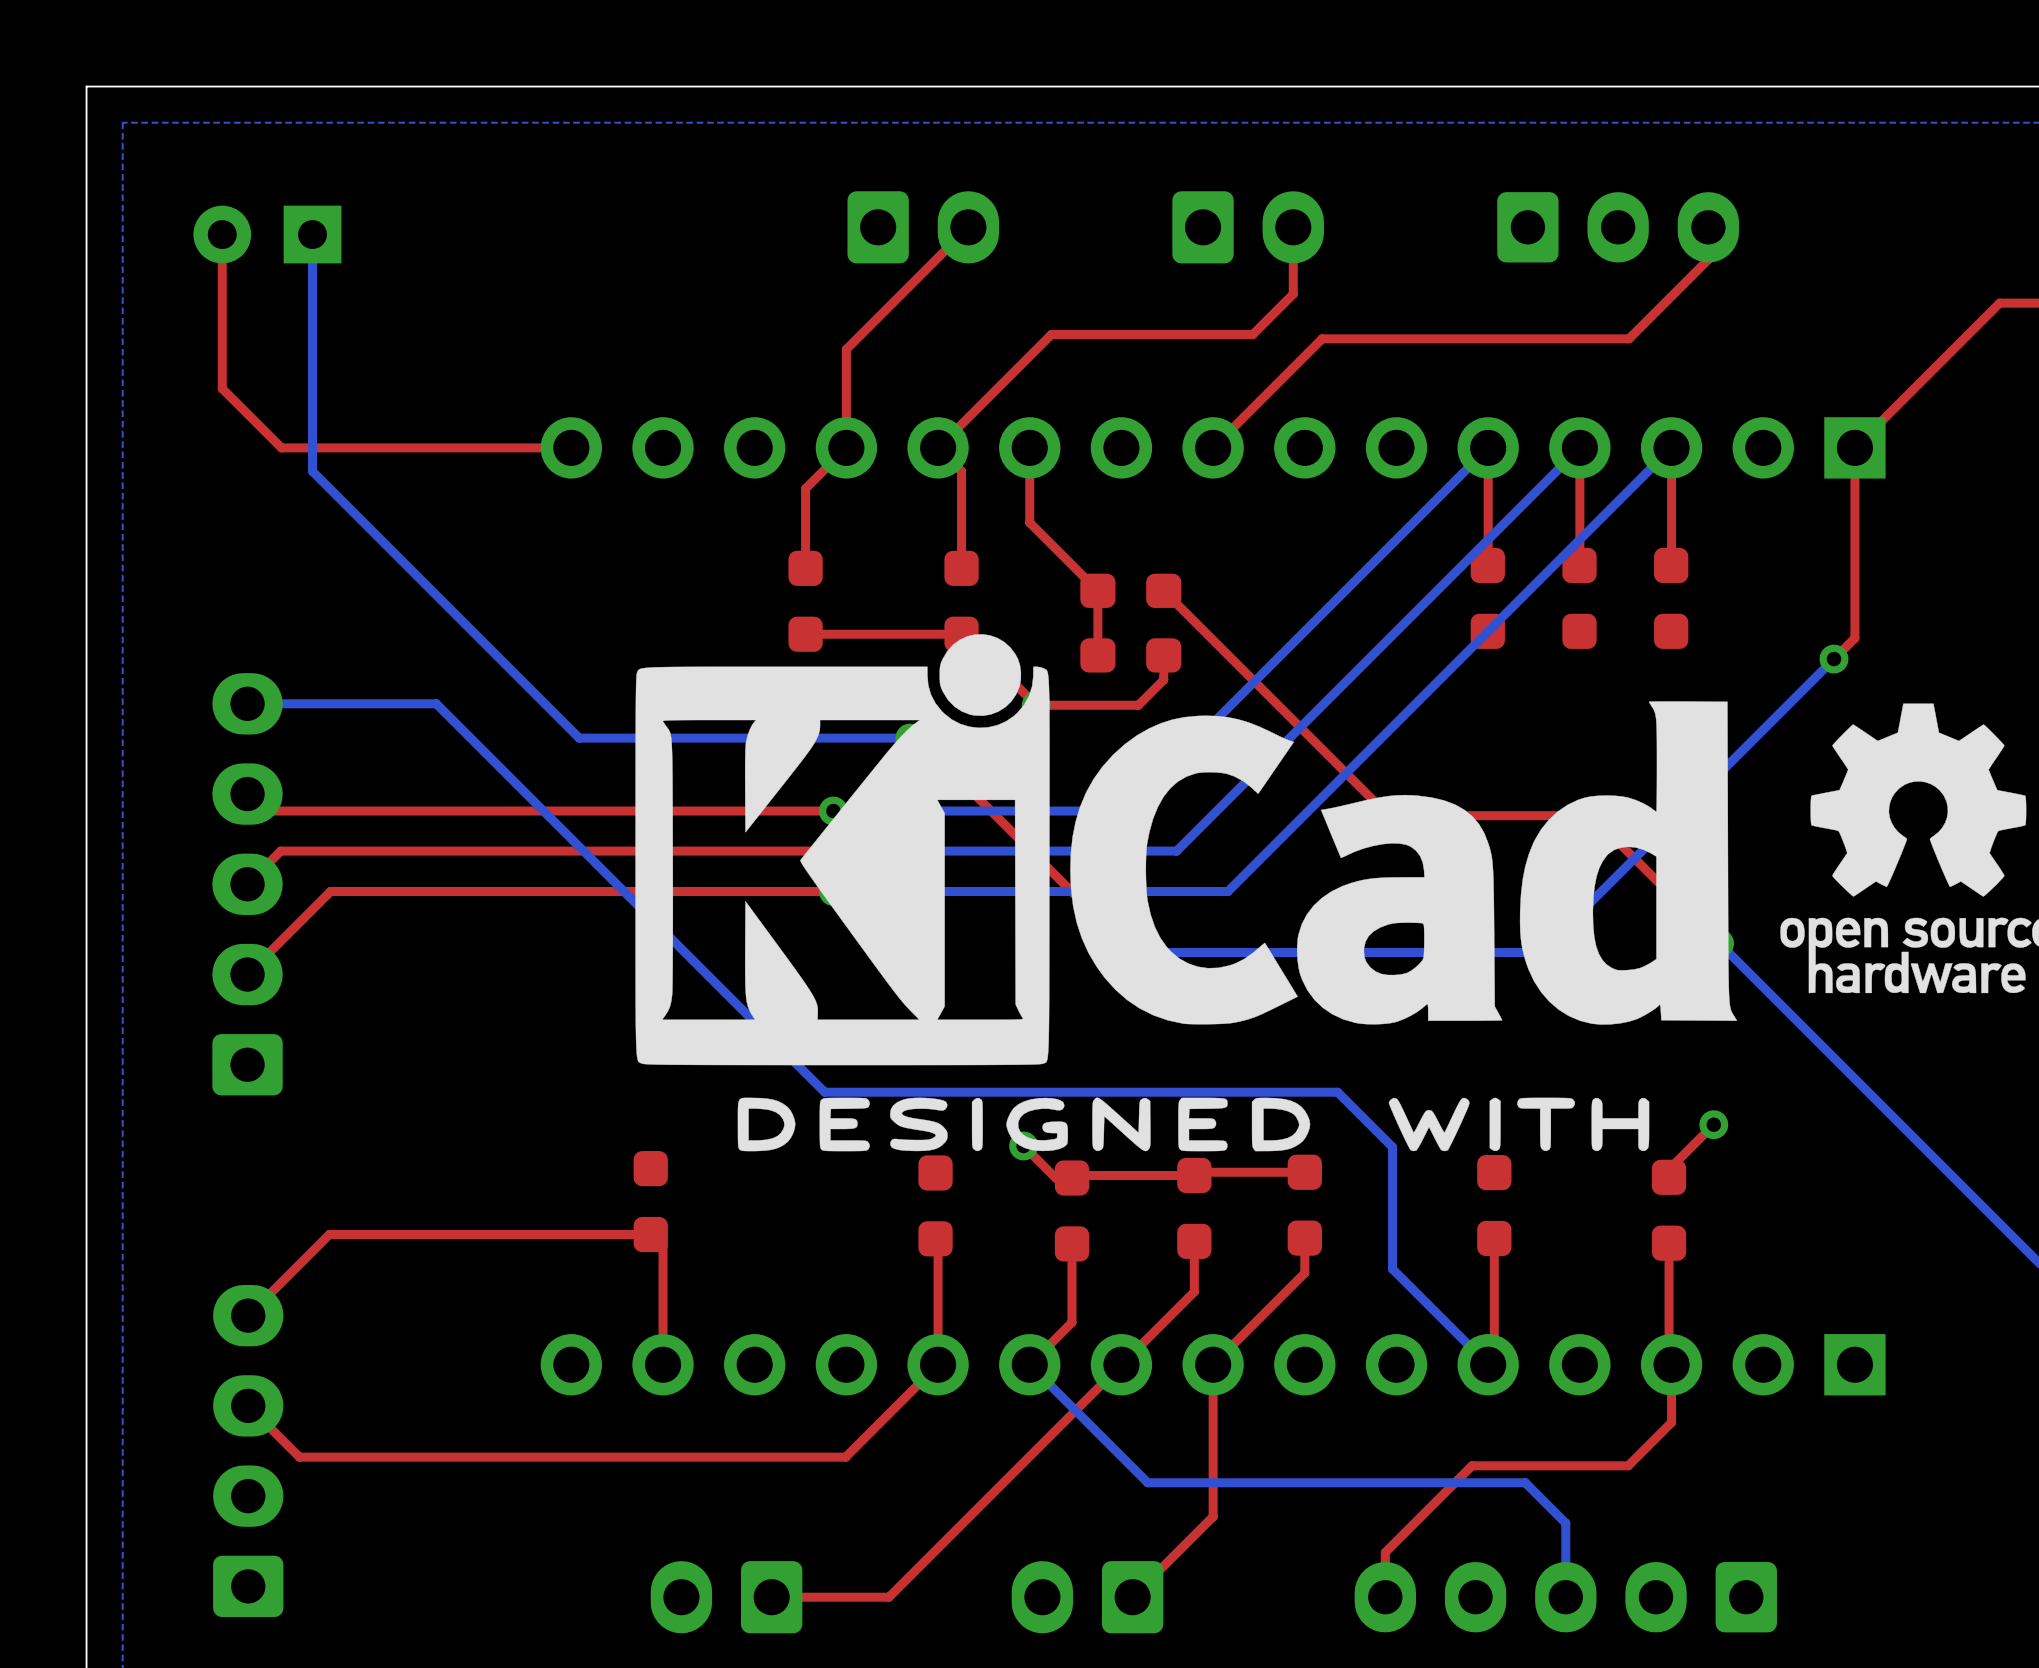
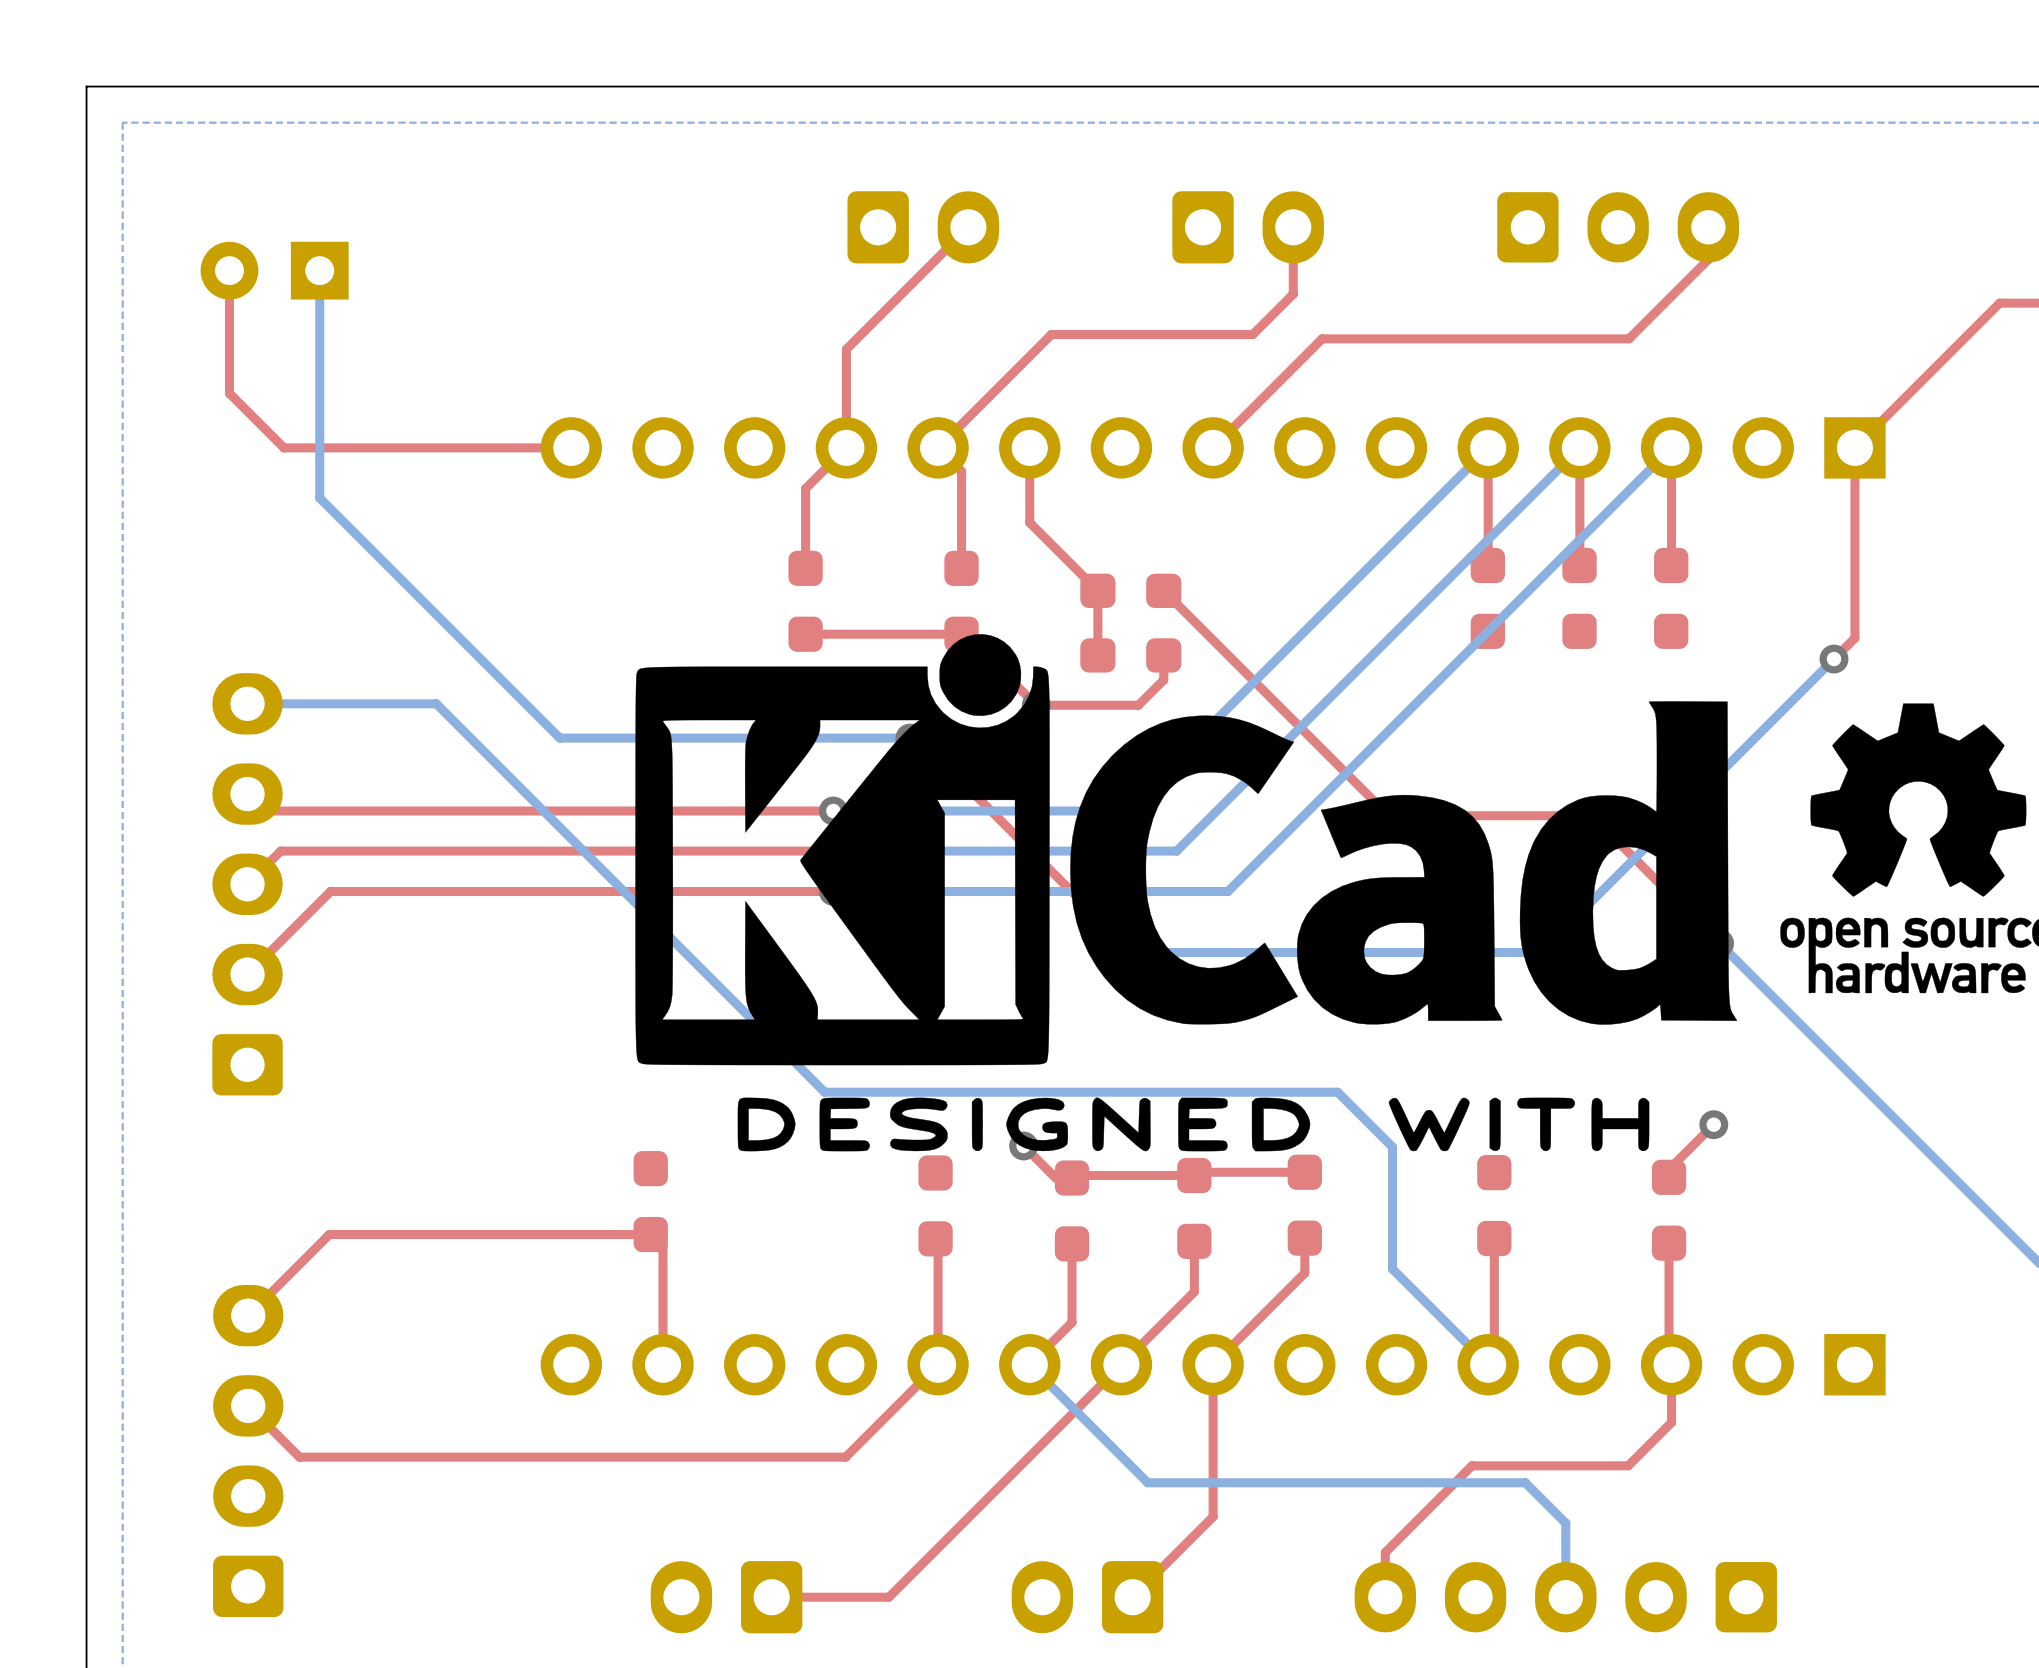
top track: (222, 234) (222, 388) (281, 447) (283, 447) -> (229, 270) (229, 393) (283, 447)
part position: (267, 234) -> (274, 270)
bottom track: (312, 234) (312, 471) (579, 738) -> (319, 270) (319, 498) (559, 738) (579, 738)

